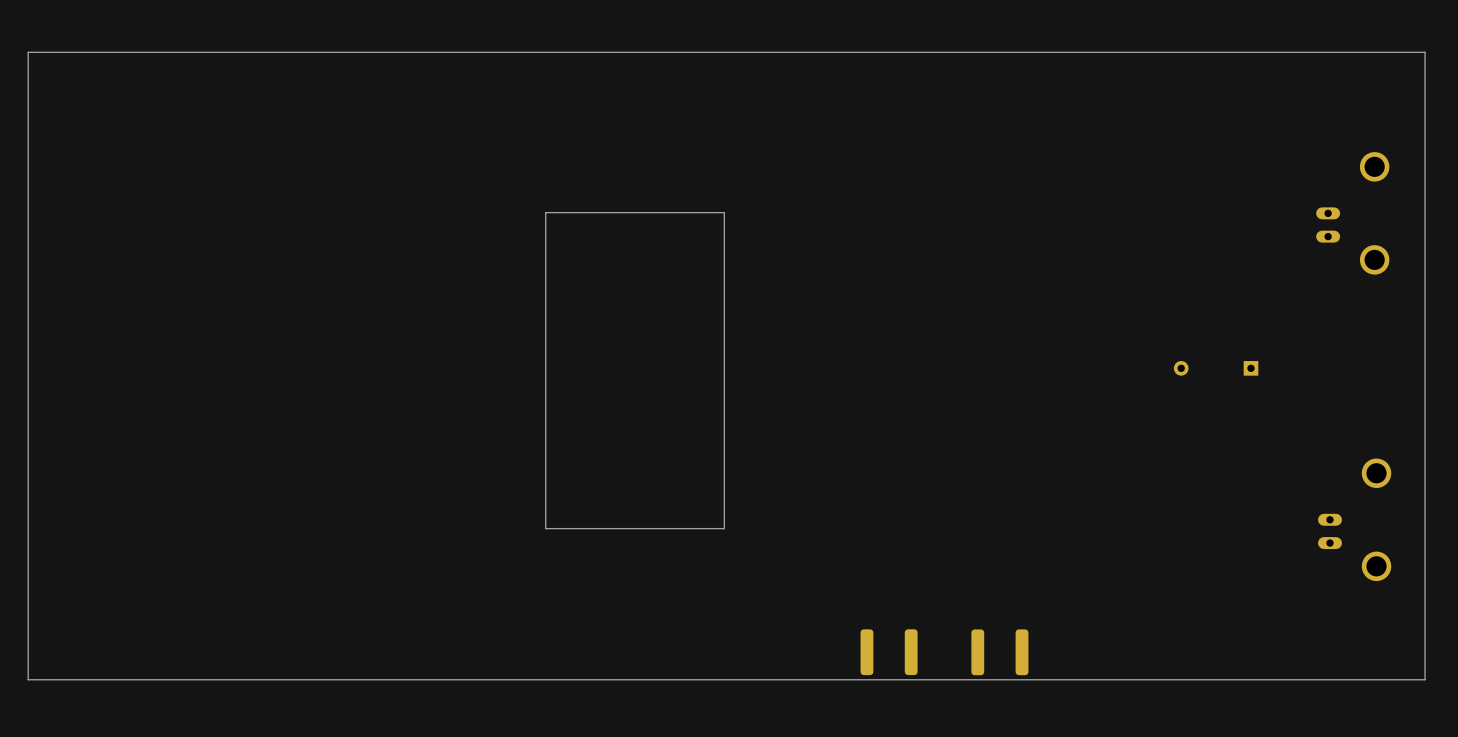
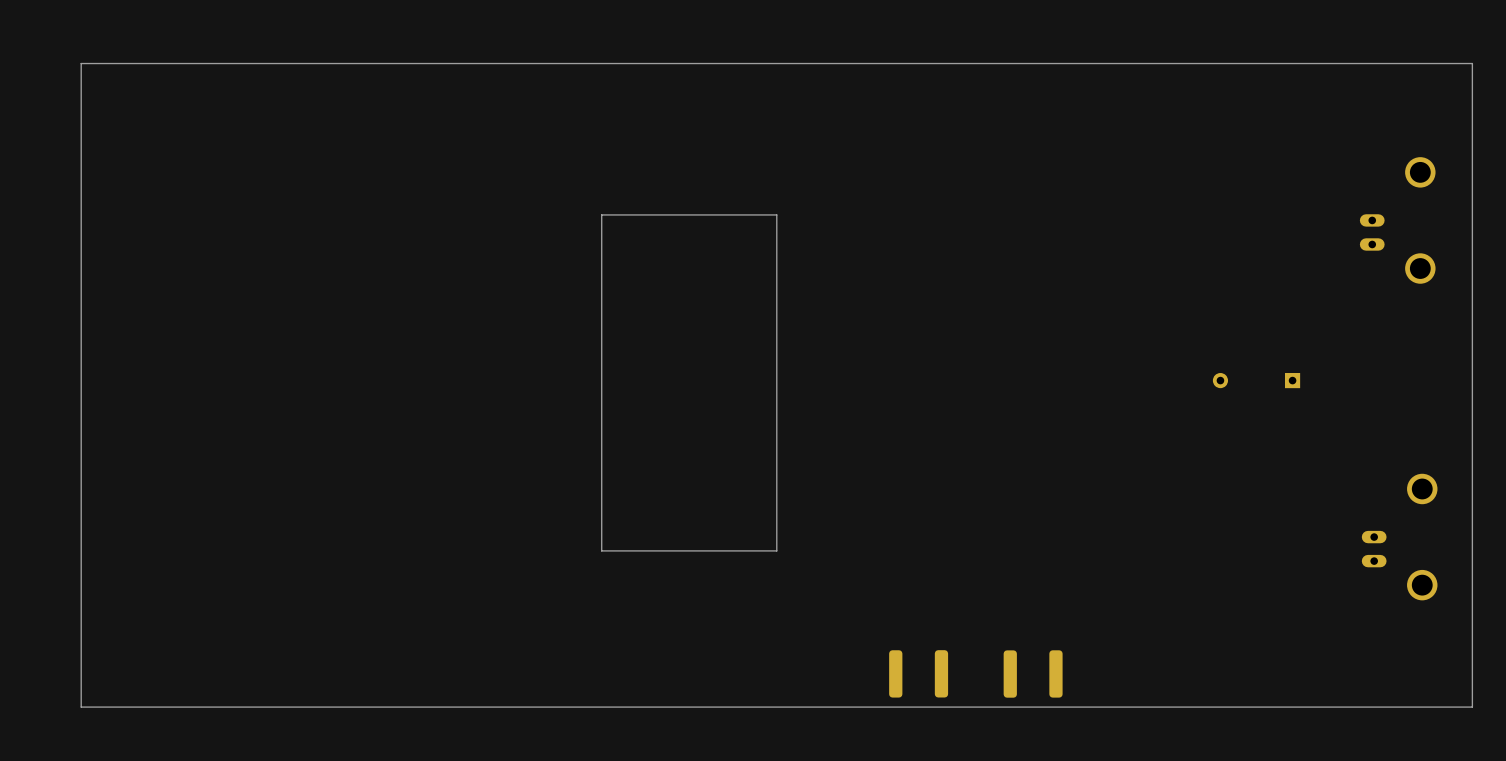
board edge: (1425, 61) (1425, 52) (28, 52) (28, 679) (1425, 679) -> (1472, 63) (81, 63) (81, 707) (1472, 707) (1472, 702)
board edge: (724, 212) (545, 212) (545, 528) (724, 528) (724, 212) -> (776, 214) (776, 550) (601, 550) (601, 214) (776, 214)

